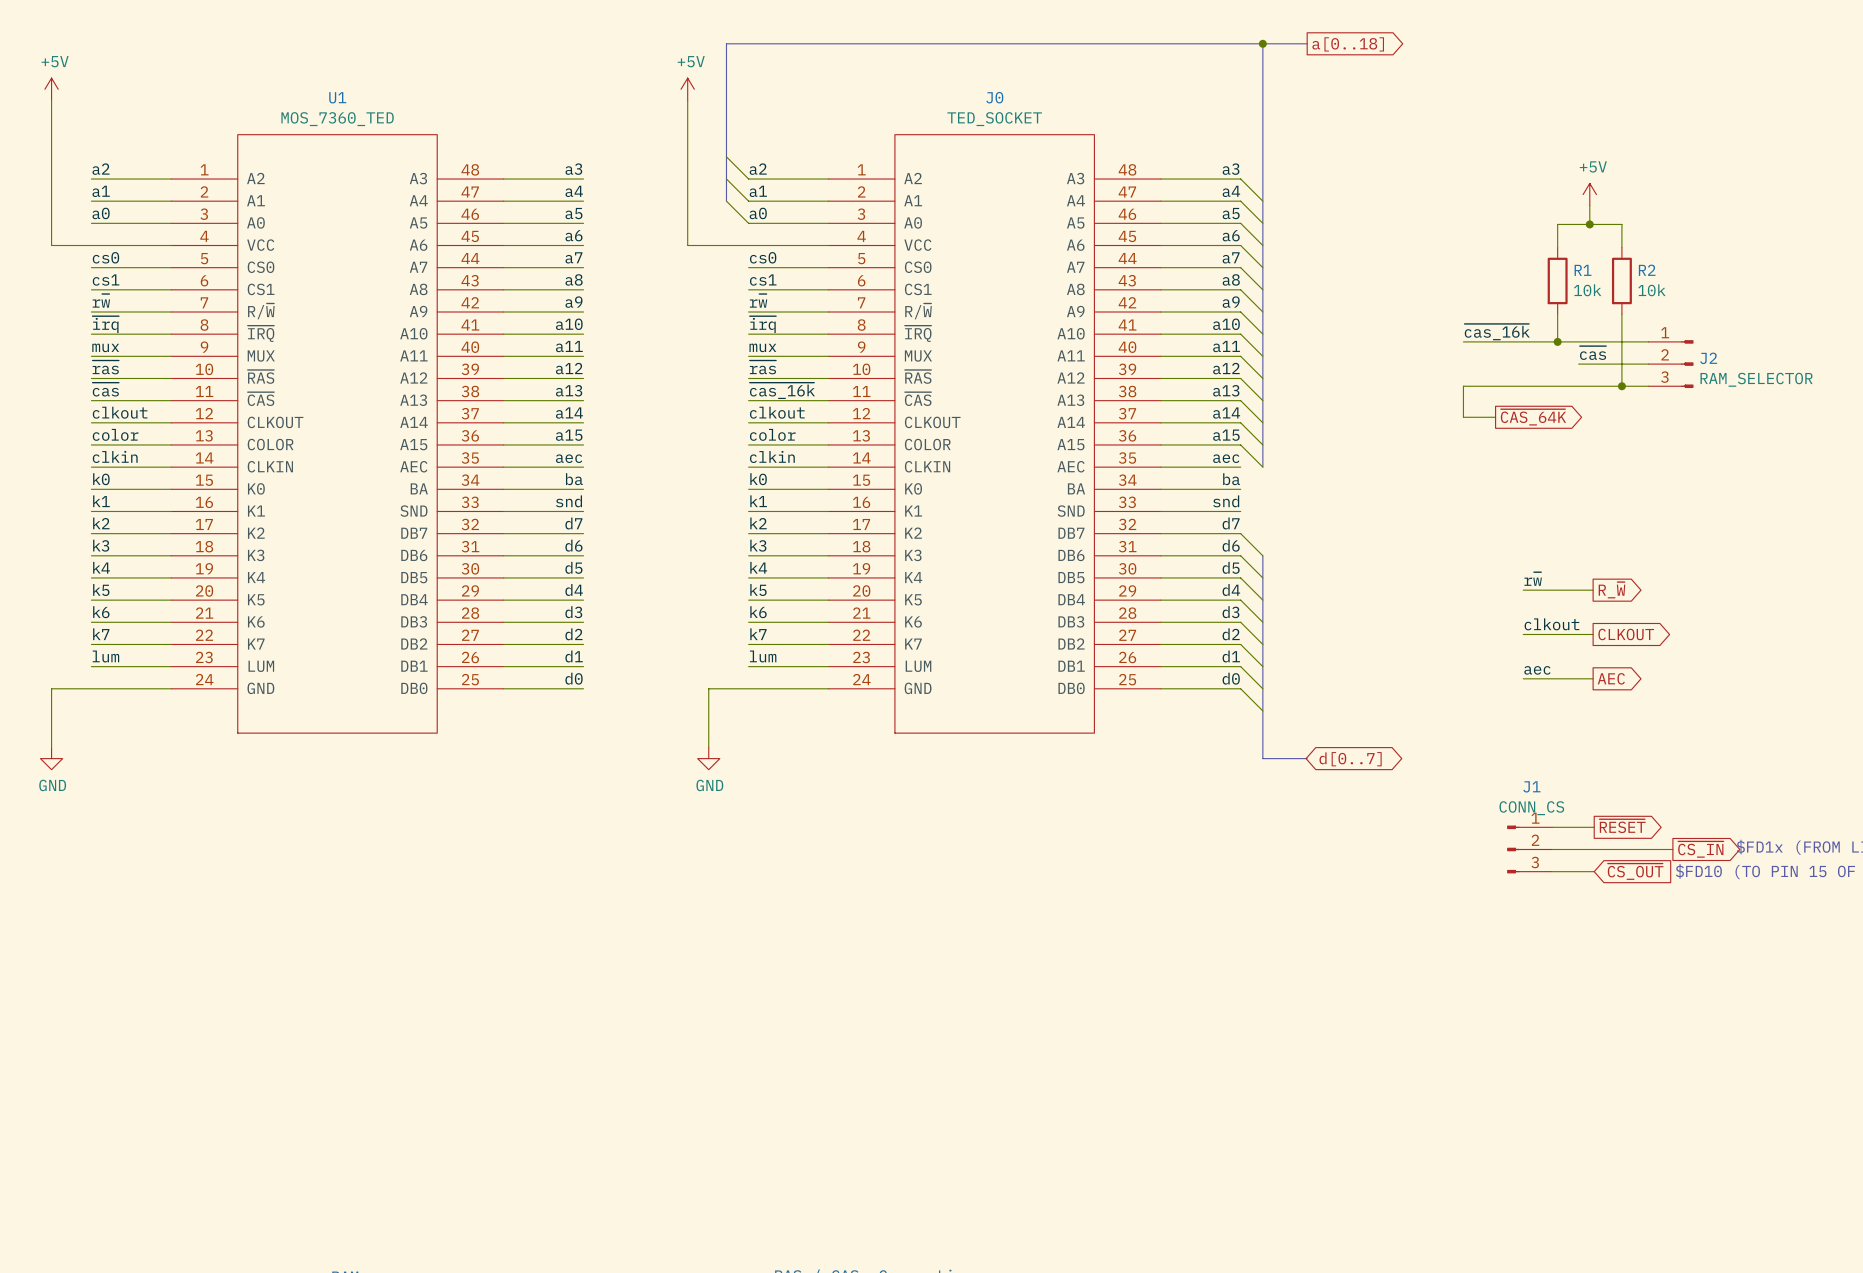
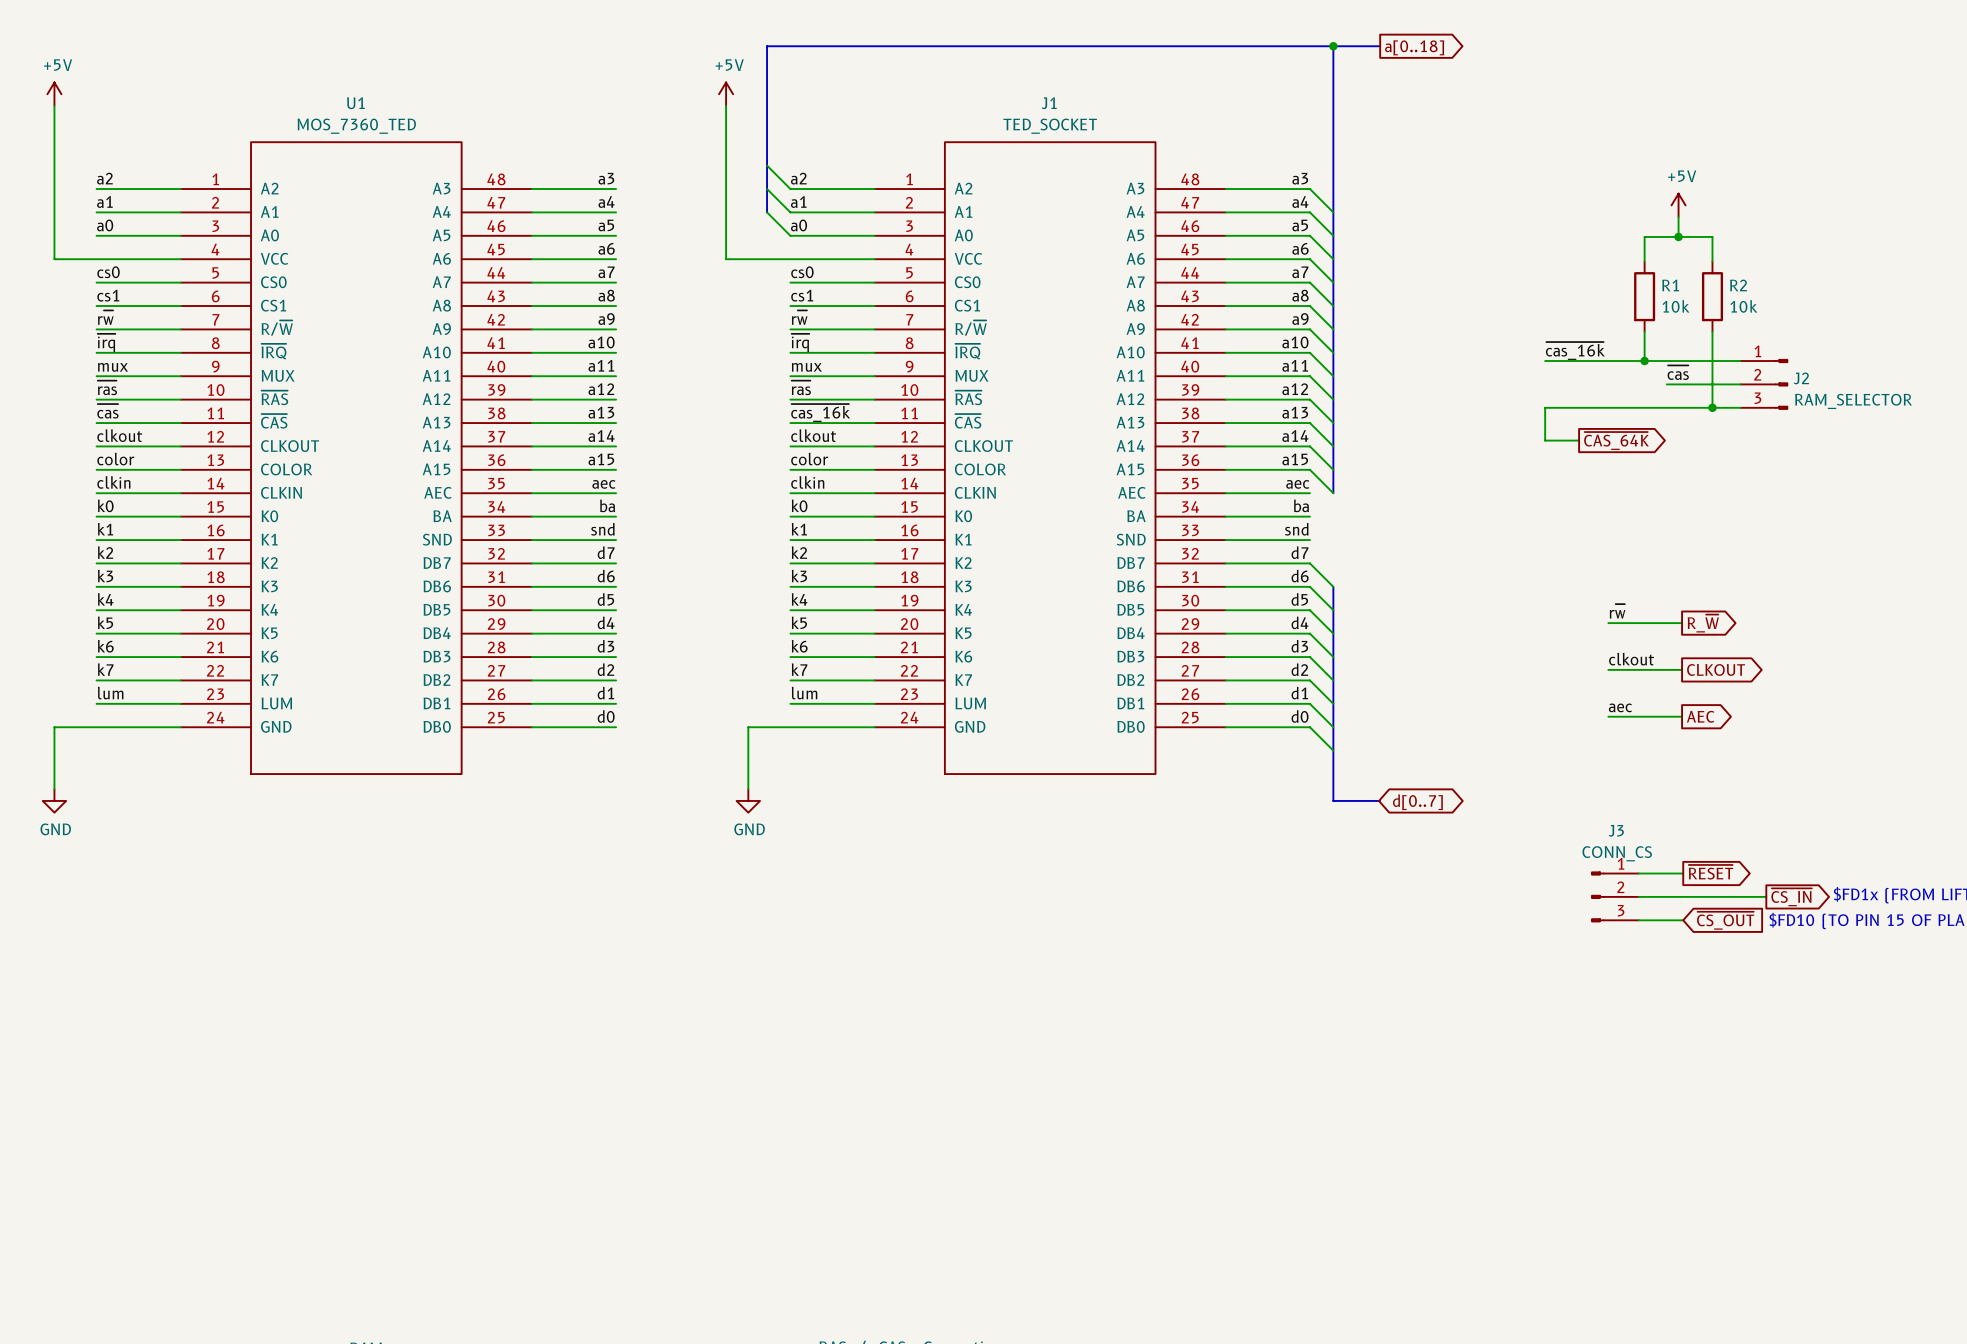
J0 name: J0 (994, 97) -> J1 (1049, 103)
J1 name: J1 (1531, 786) -> J3 (1616, 830)

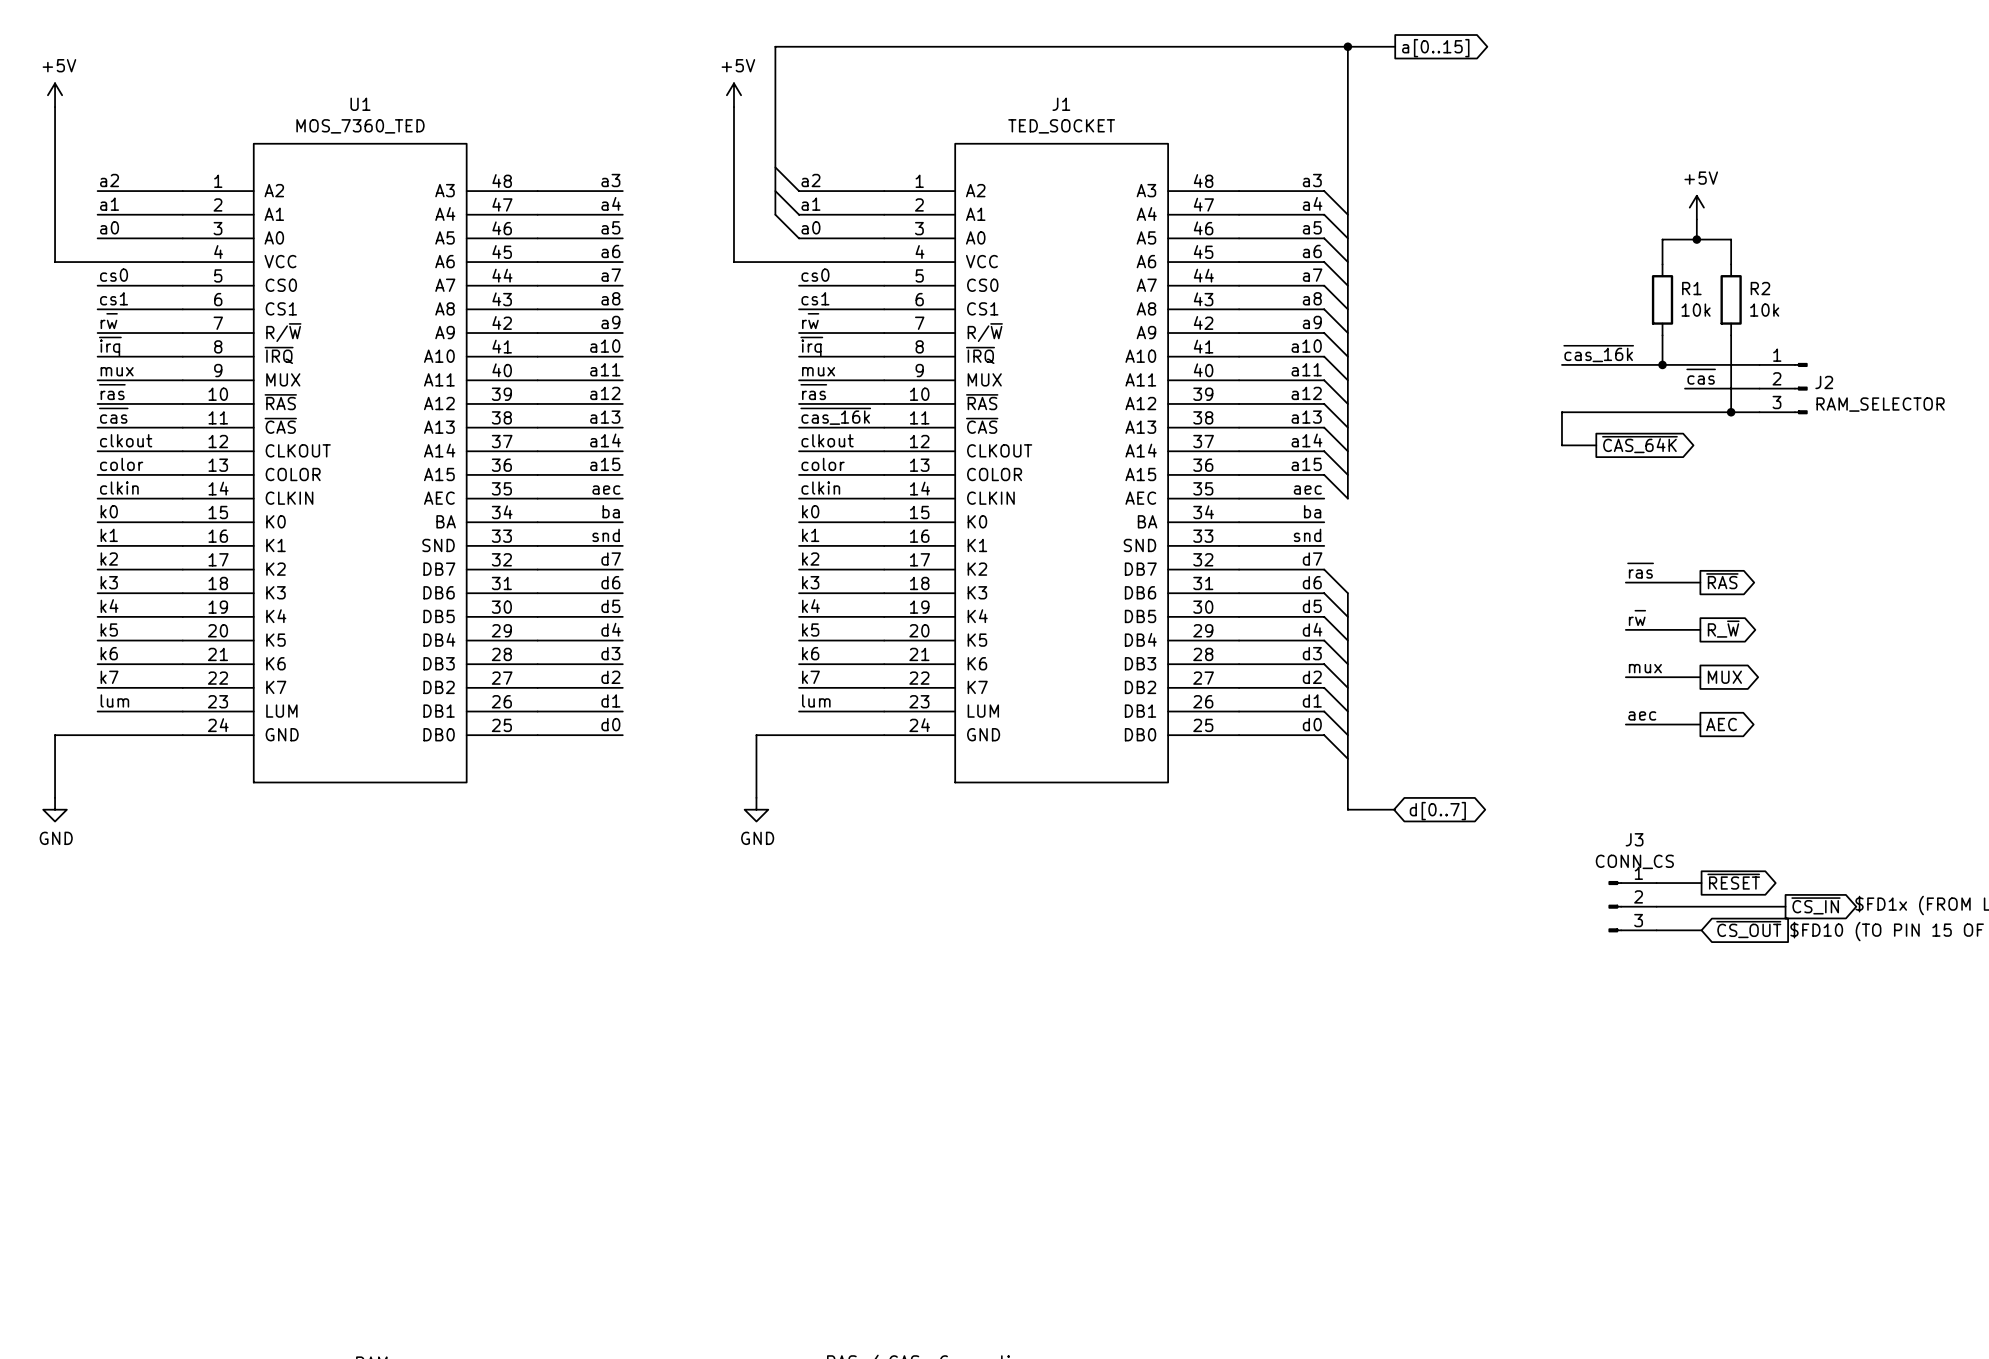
global label: a[0..18] (1414, 47) -> a[0..15] (1435, 48)
label: none -> ~{ras} (1640, 570)
global label: none -> ~{RAS} (1722, 581)
wire: none -> (1625, 582) (1700, 582)
label: clkout (1631, 659) -> mux (1645, 668)
global label: CLKOUT (1716, 669) -> MUX (1724, 677)

